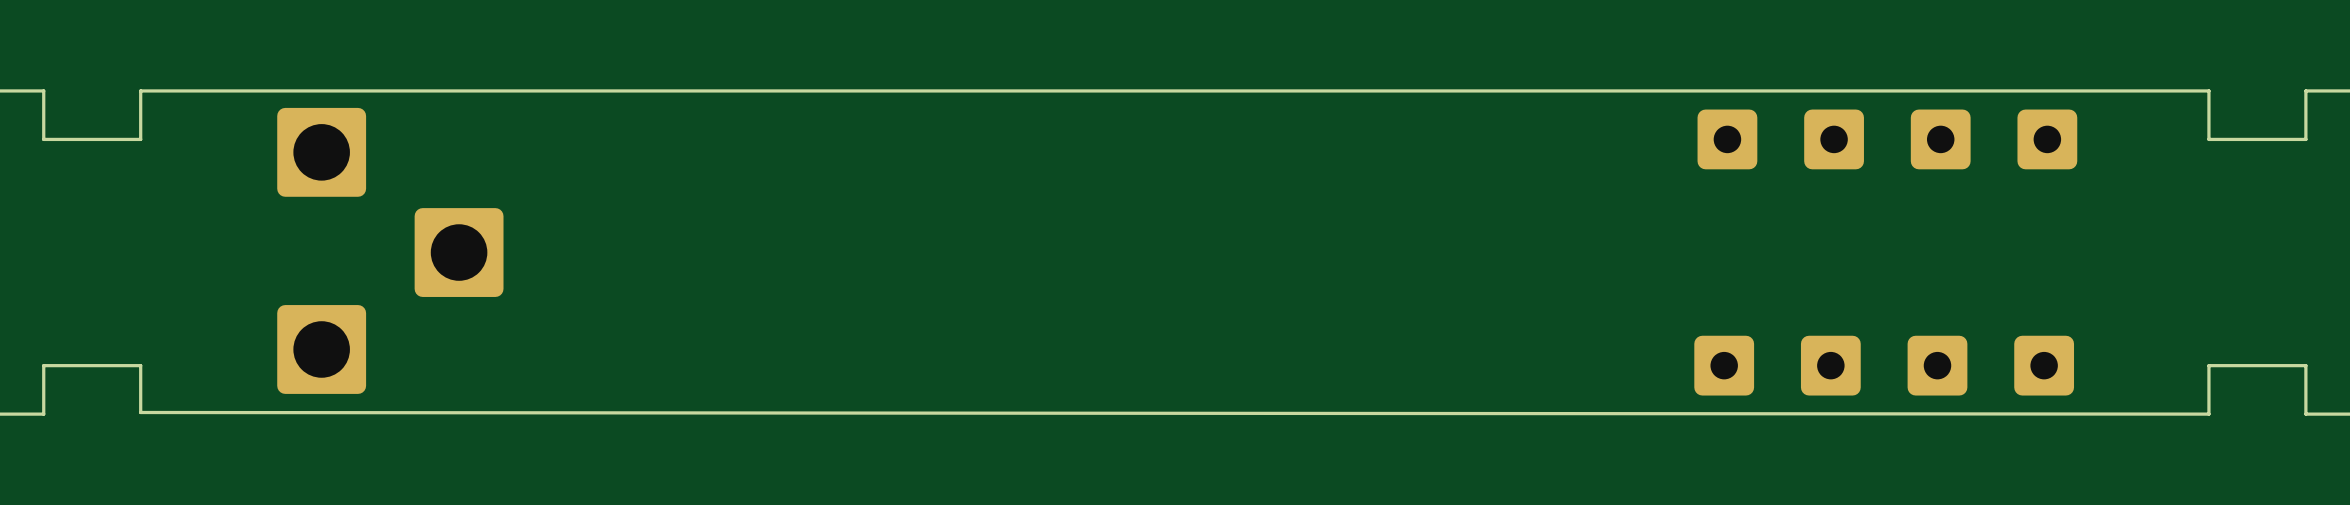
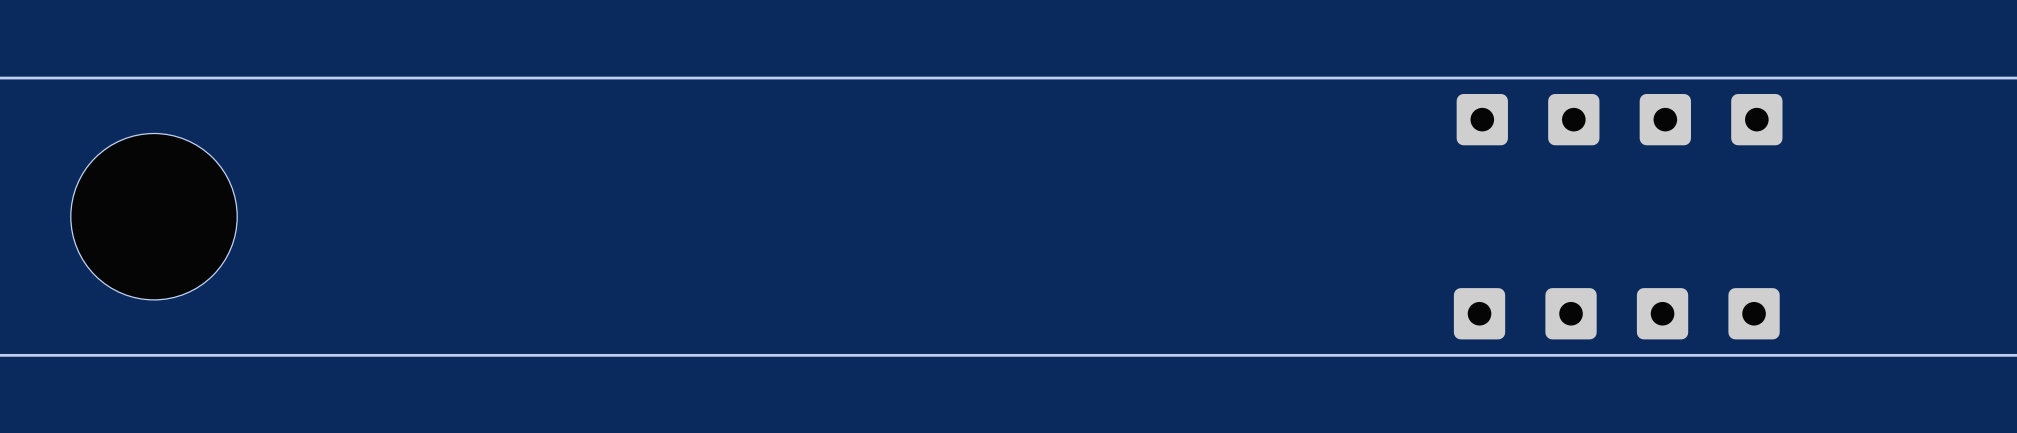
board edge: (140, 90) (140, 139) (43, 139) (43, 90) -> (120, 78) (37, 78)
board edge: (2305, 90) (2305, 139) (2208, 139) (2208, 90) -> (1978, 78) (1895, 78)
part: (321, 152) -> none
part: none -> (154, 216)
part: (459, 252) -> none
part: (321, 349) -> none
board edge: (2305, 414) (2305, 365) (2208, 365) (2208, 414) (140, 412) (140, 365) (43, 365) (43, 414) -> (1978, 355) (37, 355)

